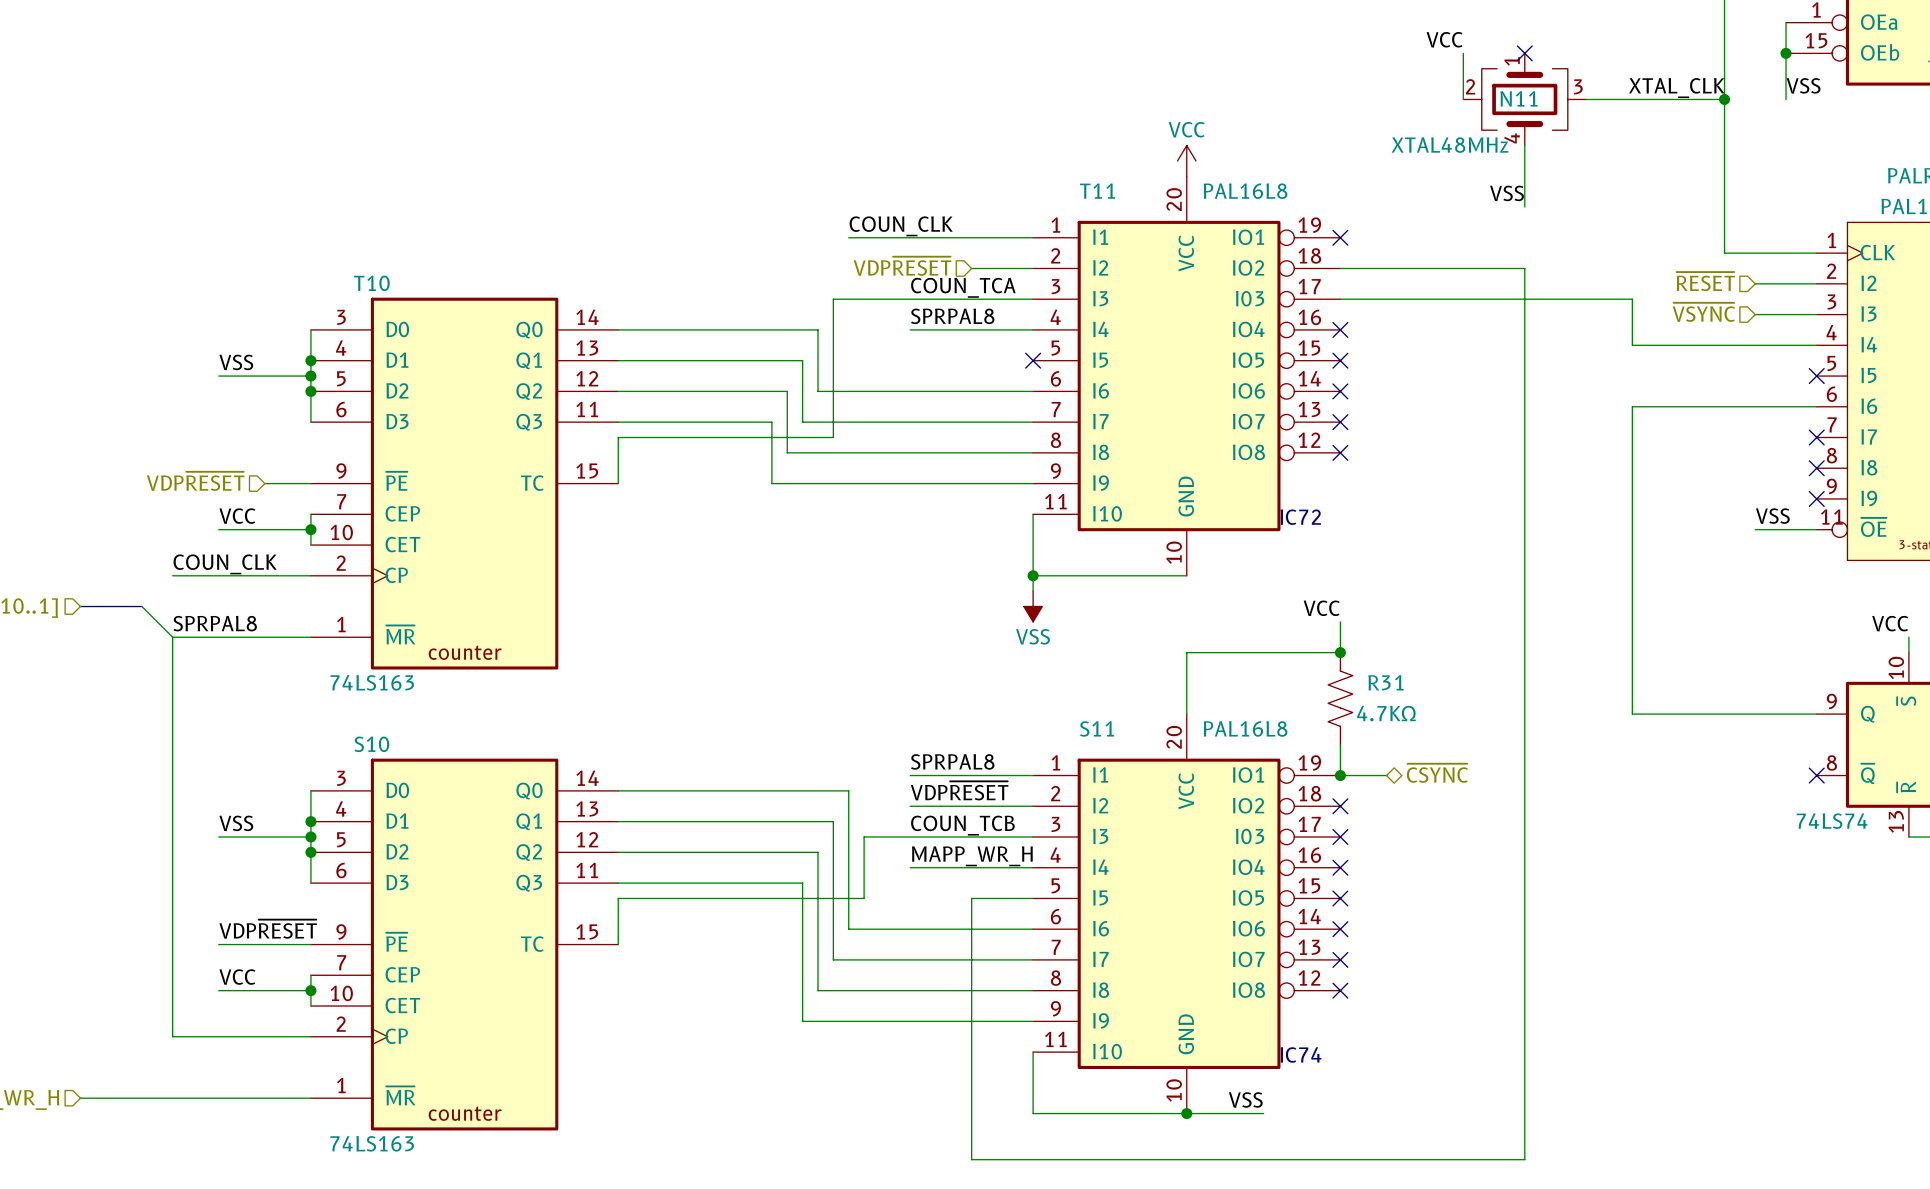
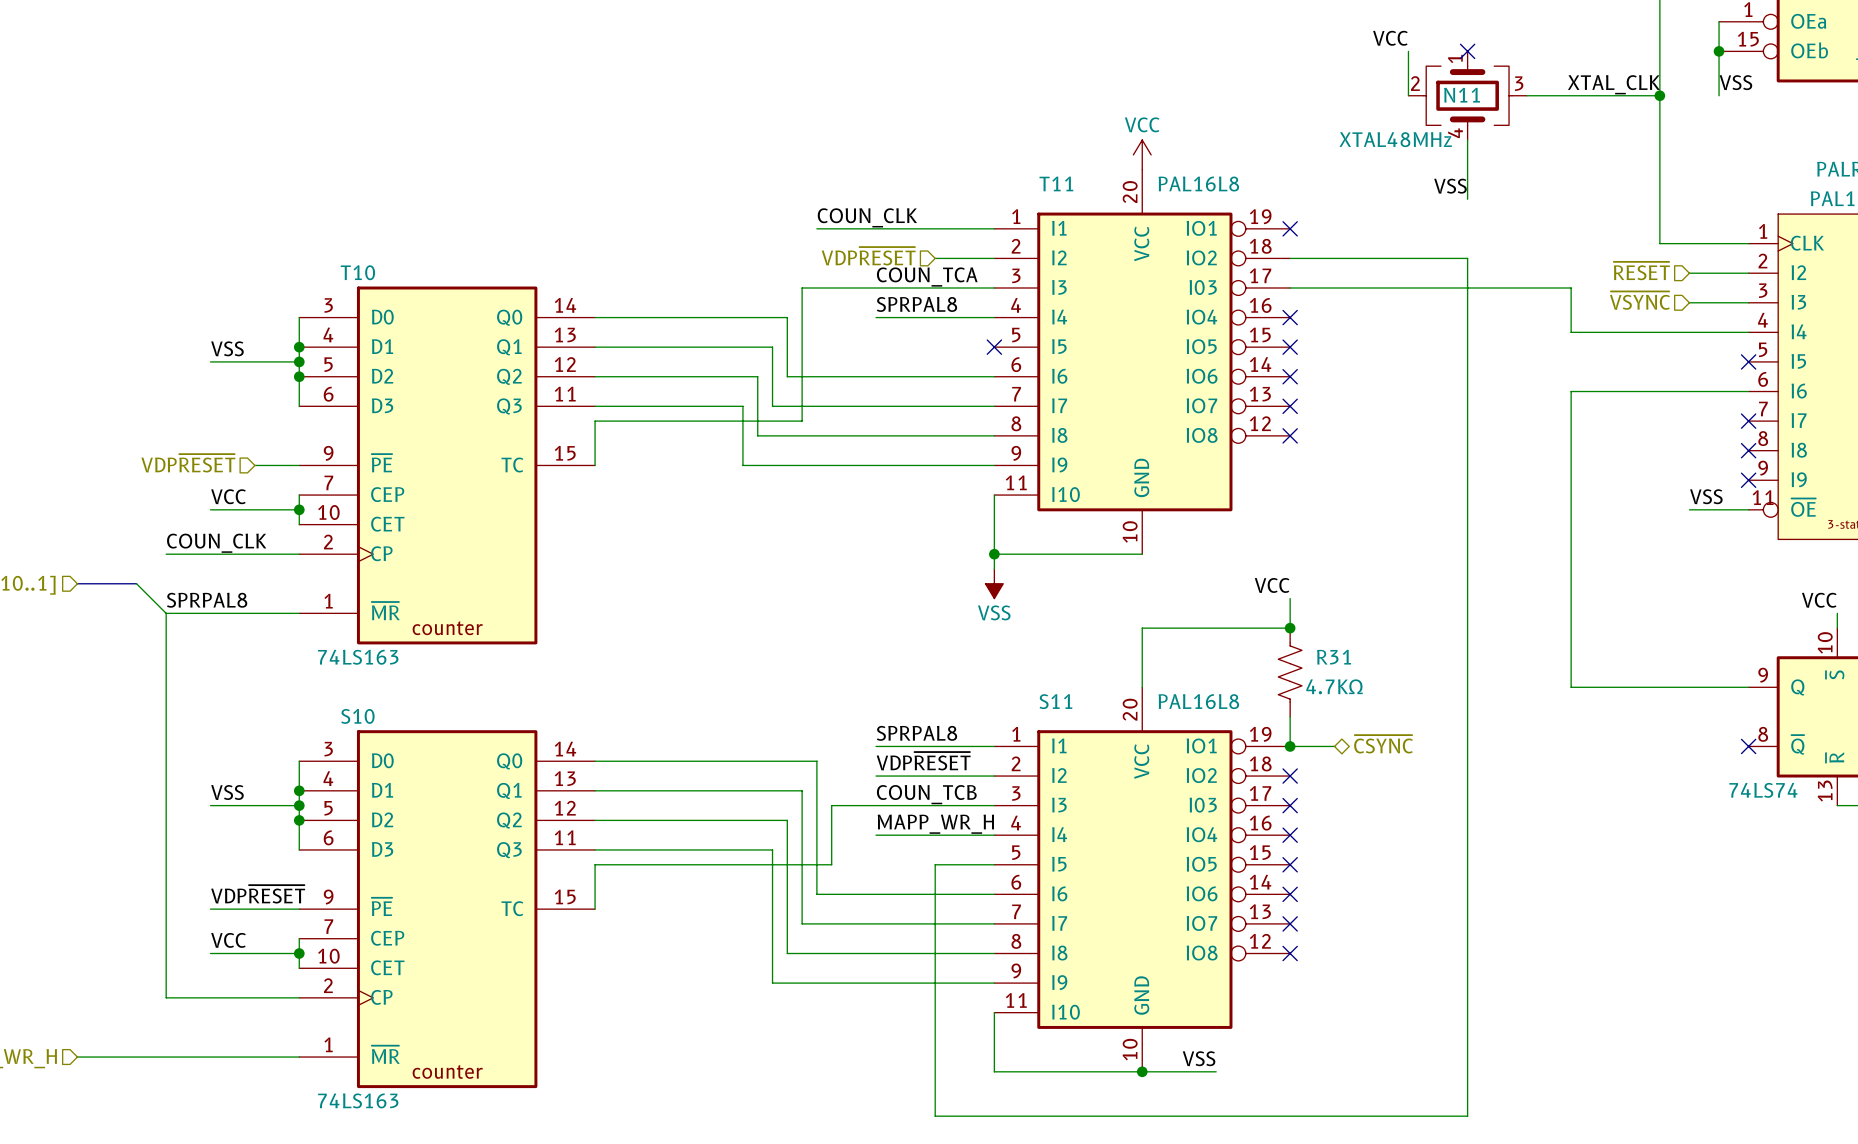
text: IC72 (1300, 517) -> none
text: IC74 (1300, 1054) -> none

